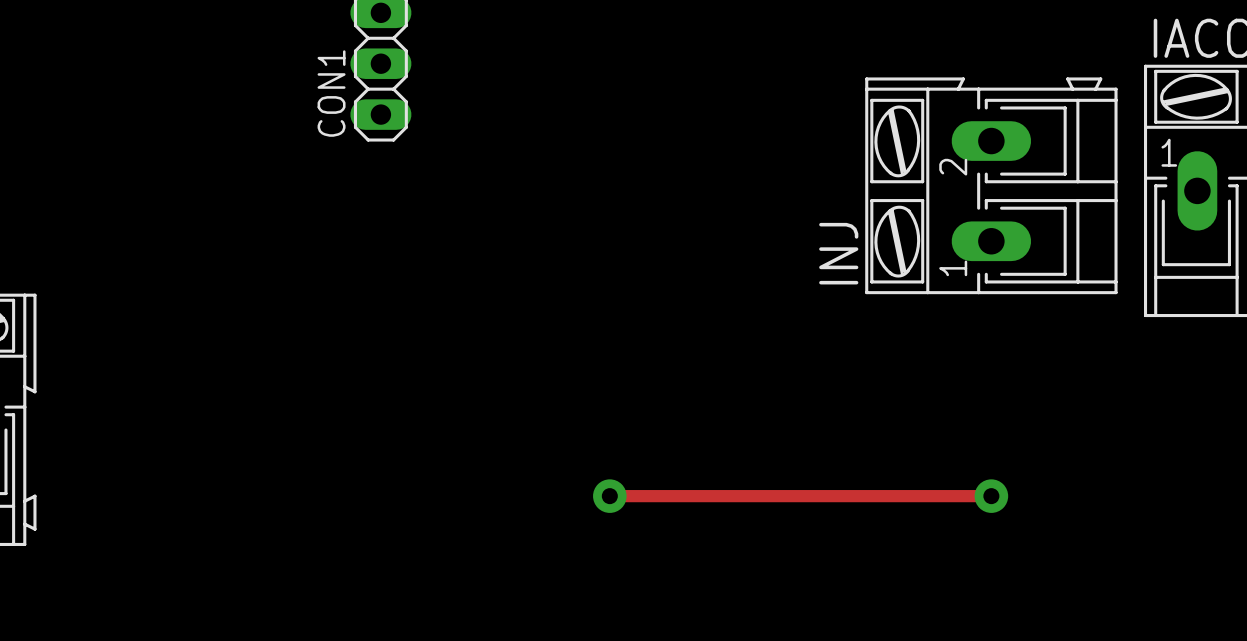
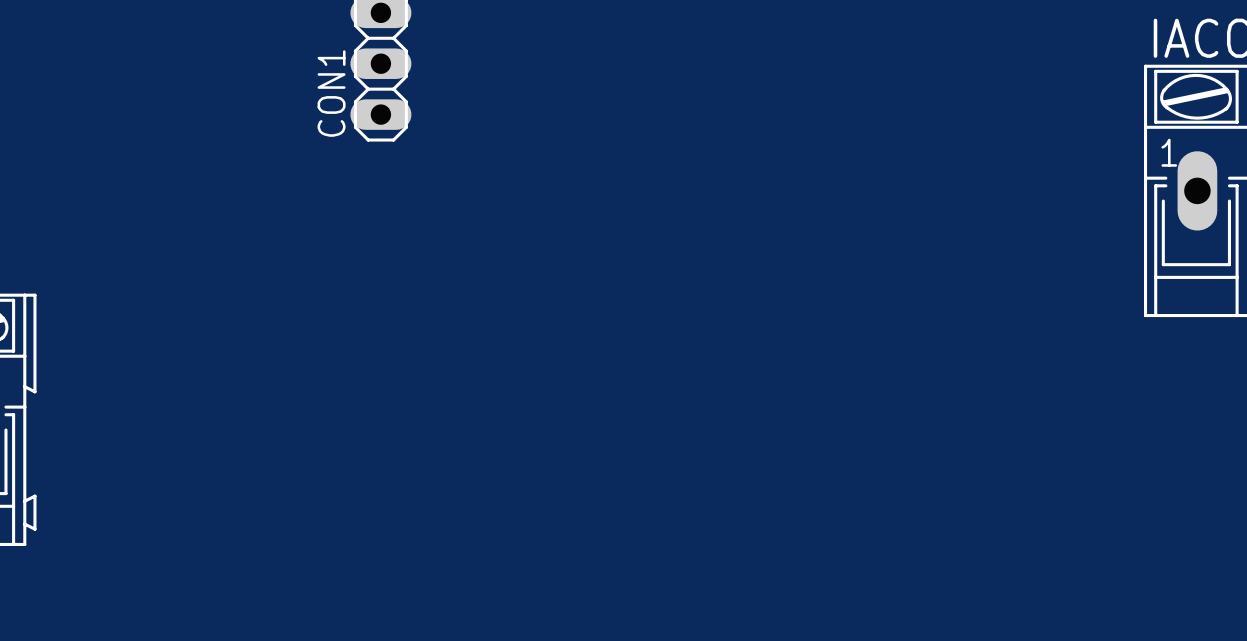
INJ: (991, 185) -> none
track: (609, 496) (991, 496) -> none
via: (609, 496) -> none
via: (991, 496) -> none

